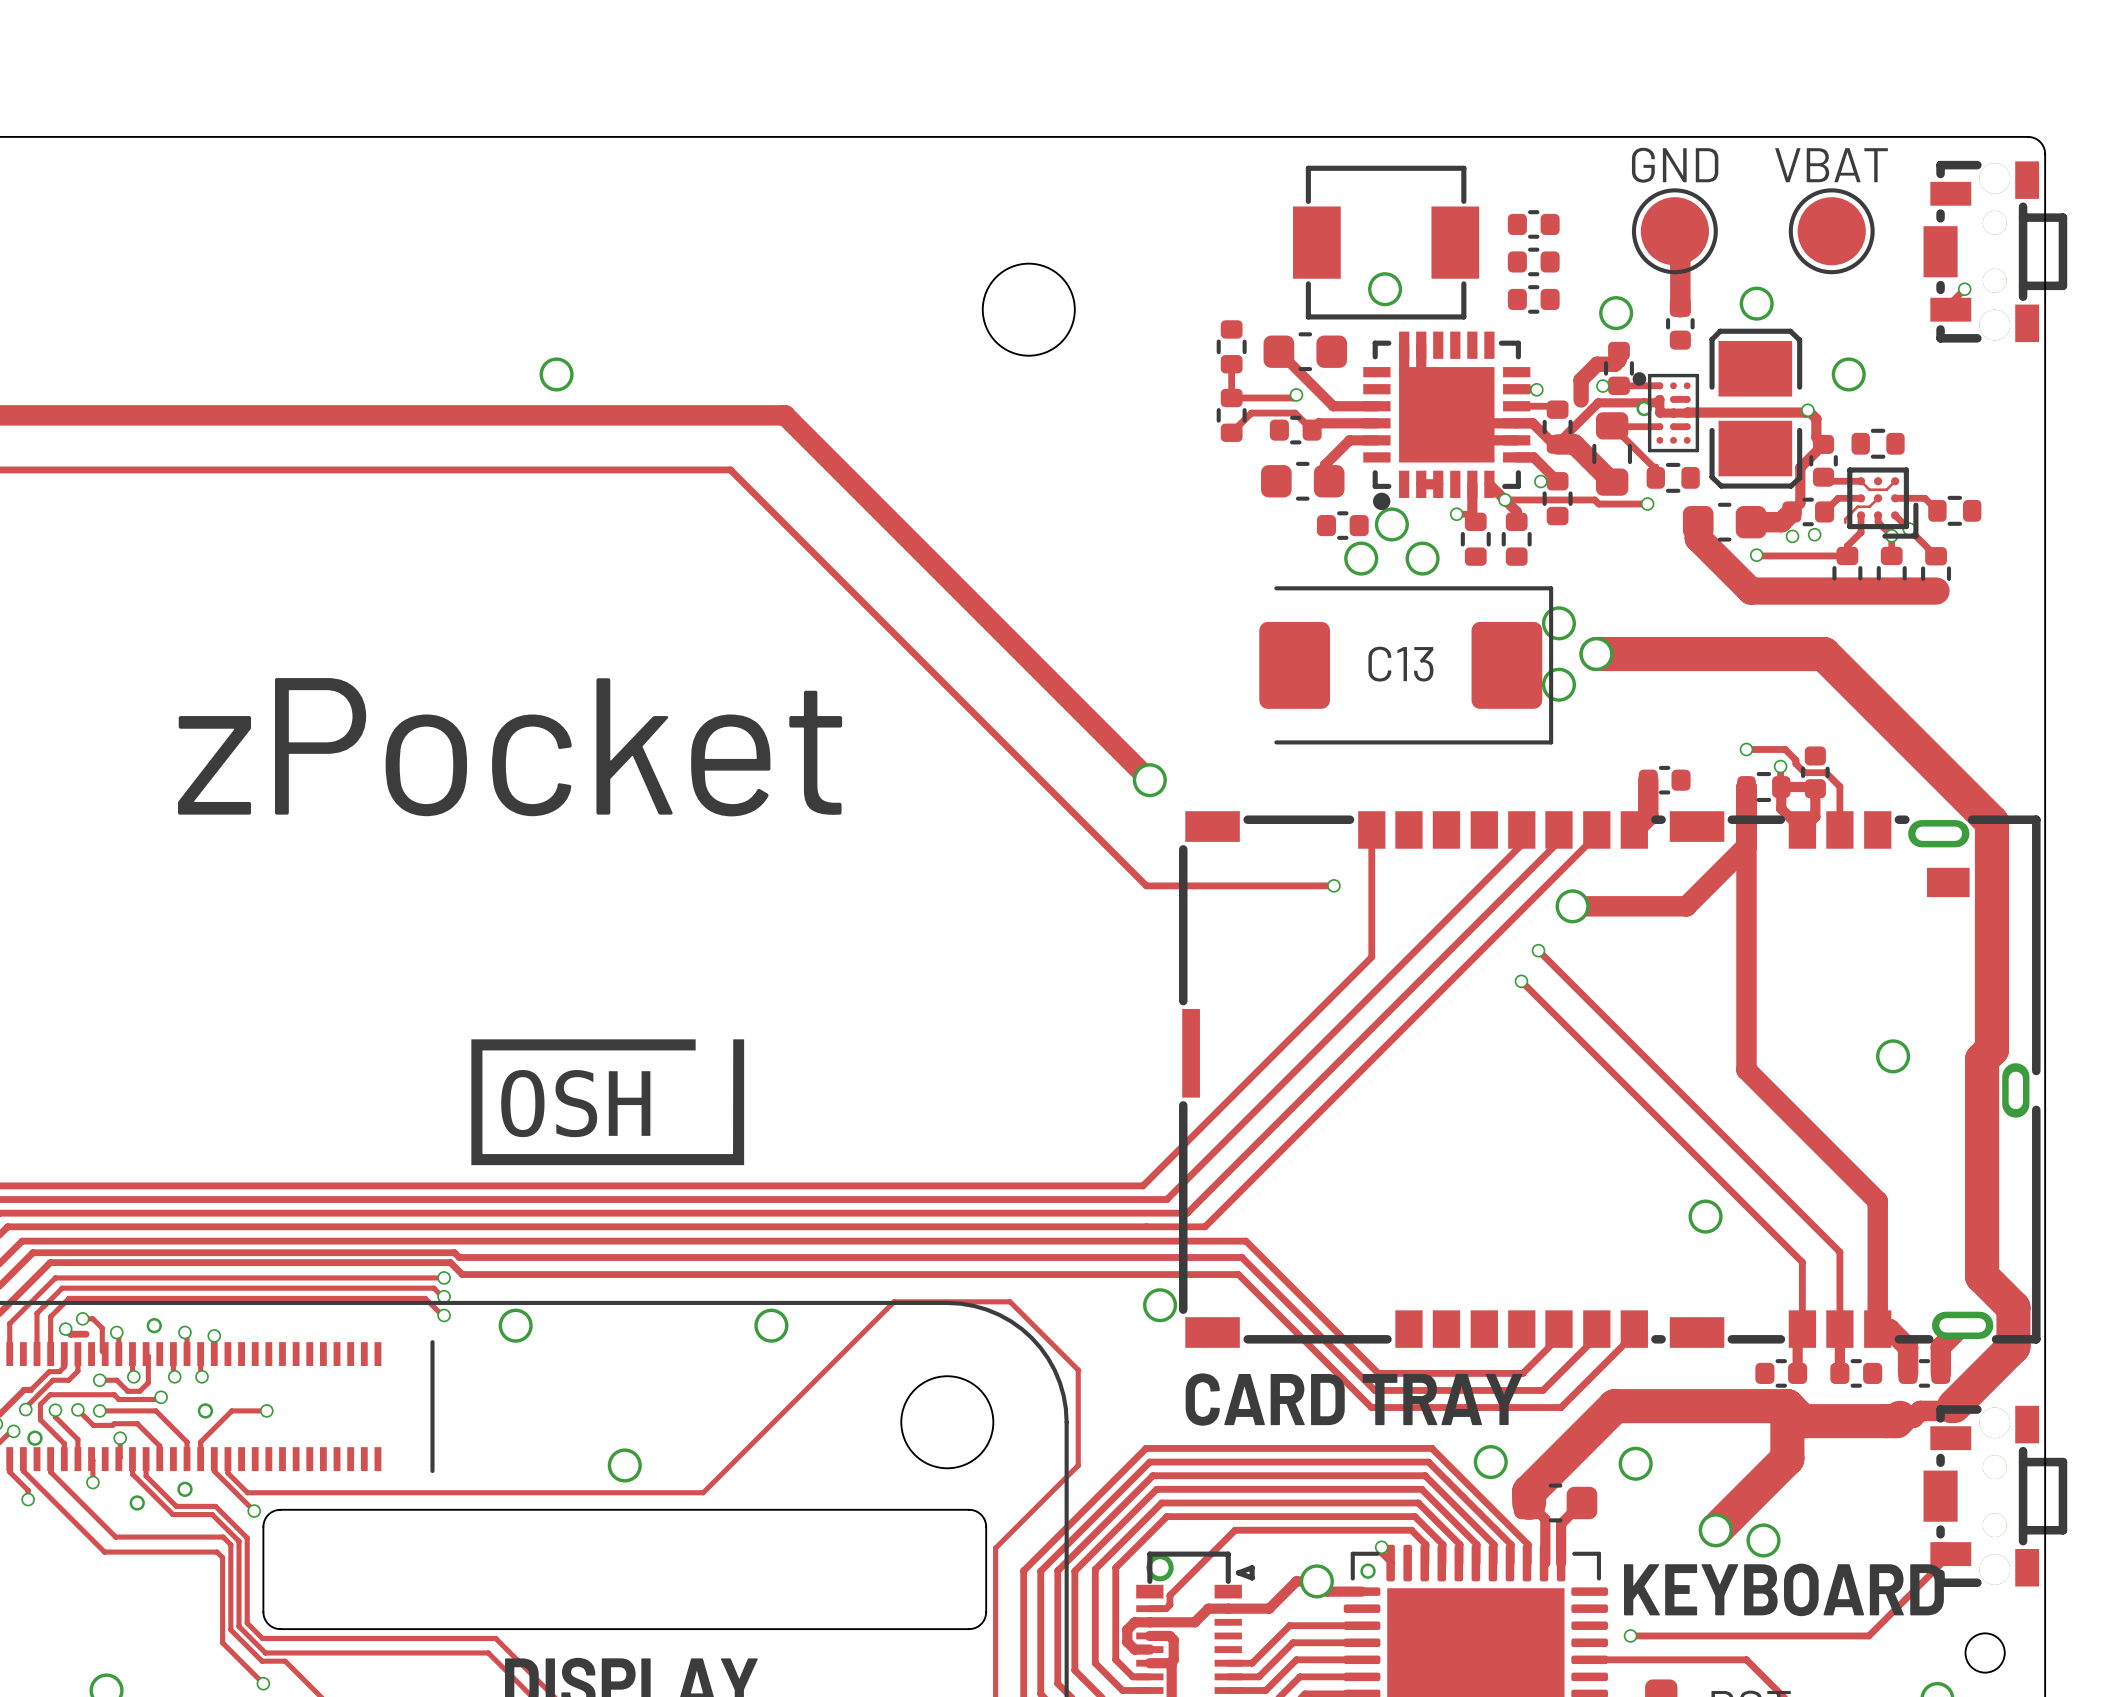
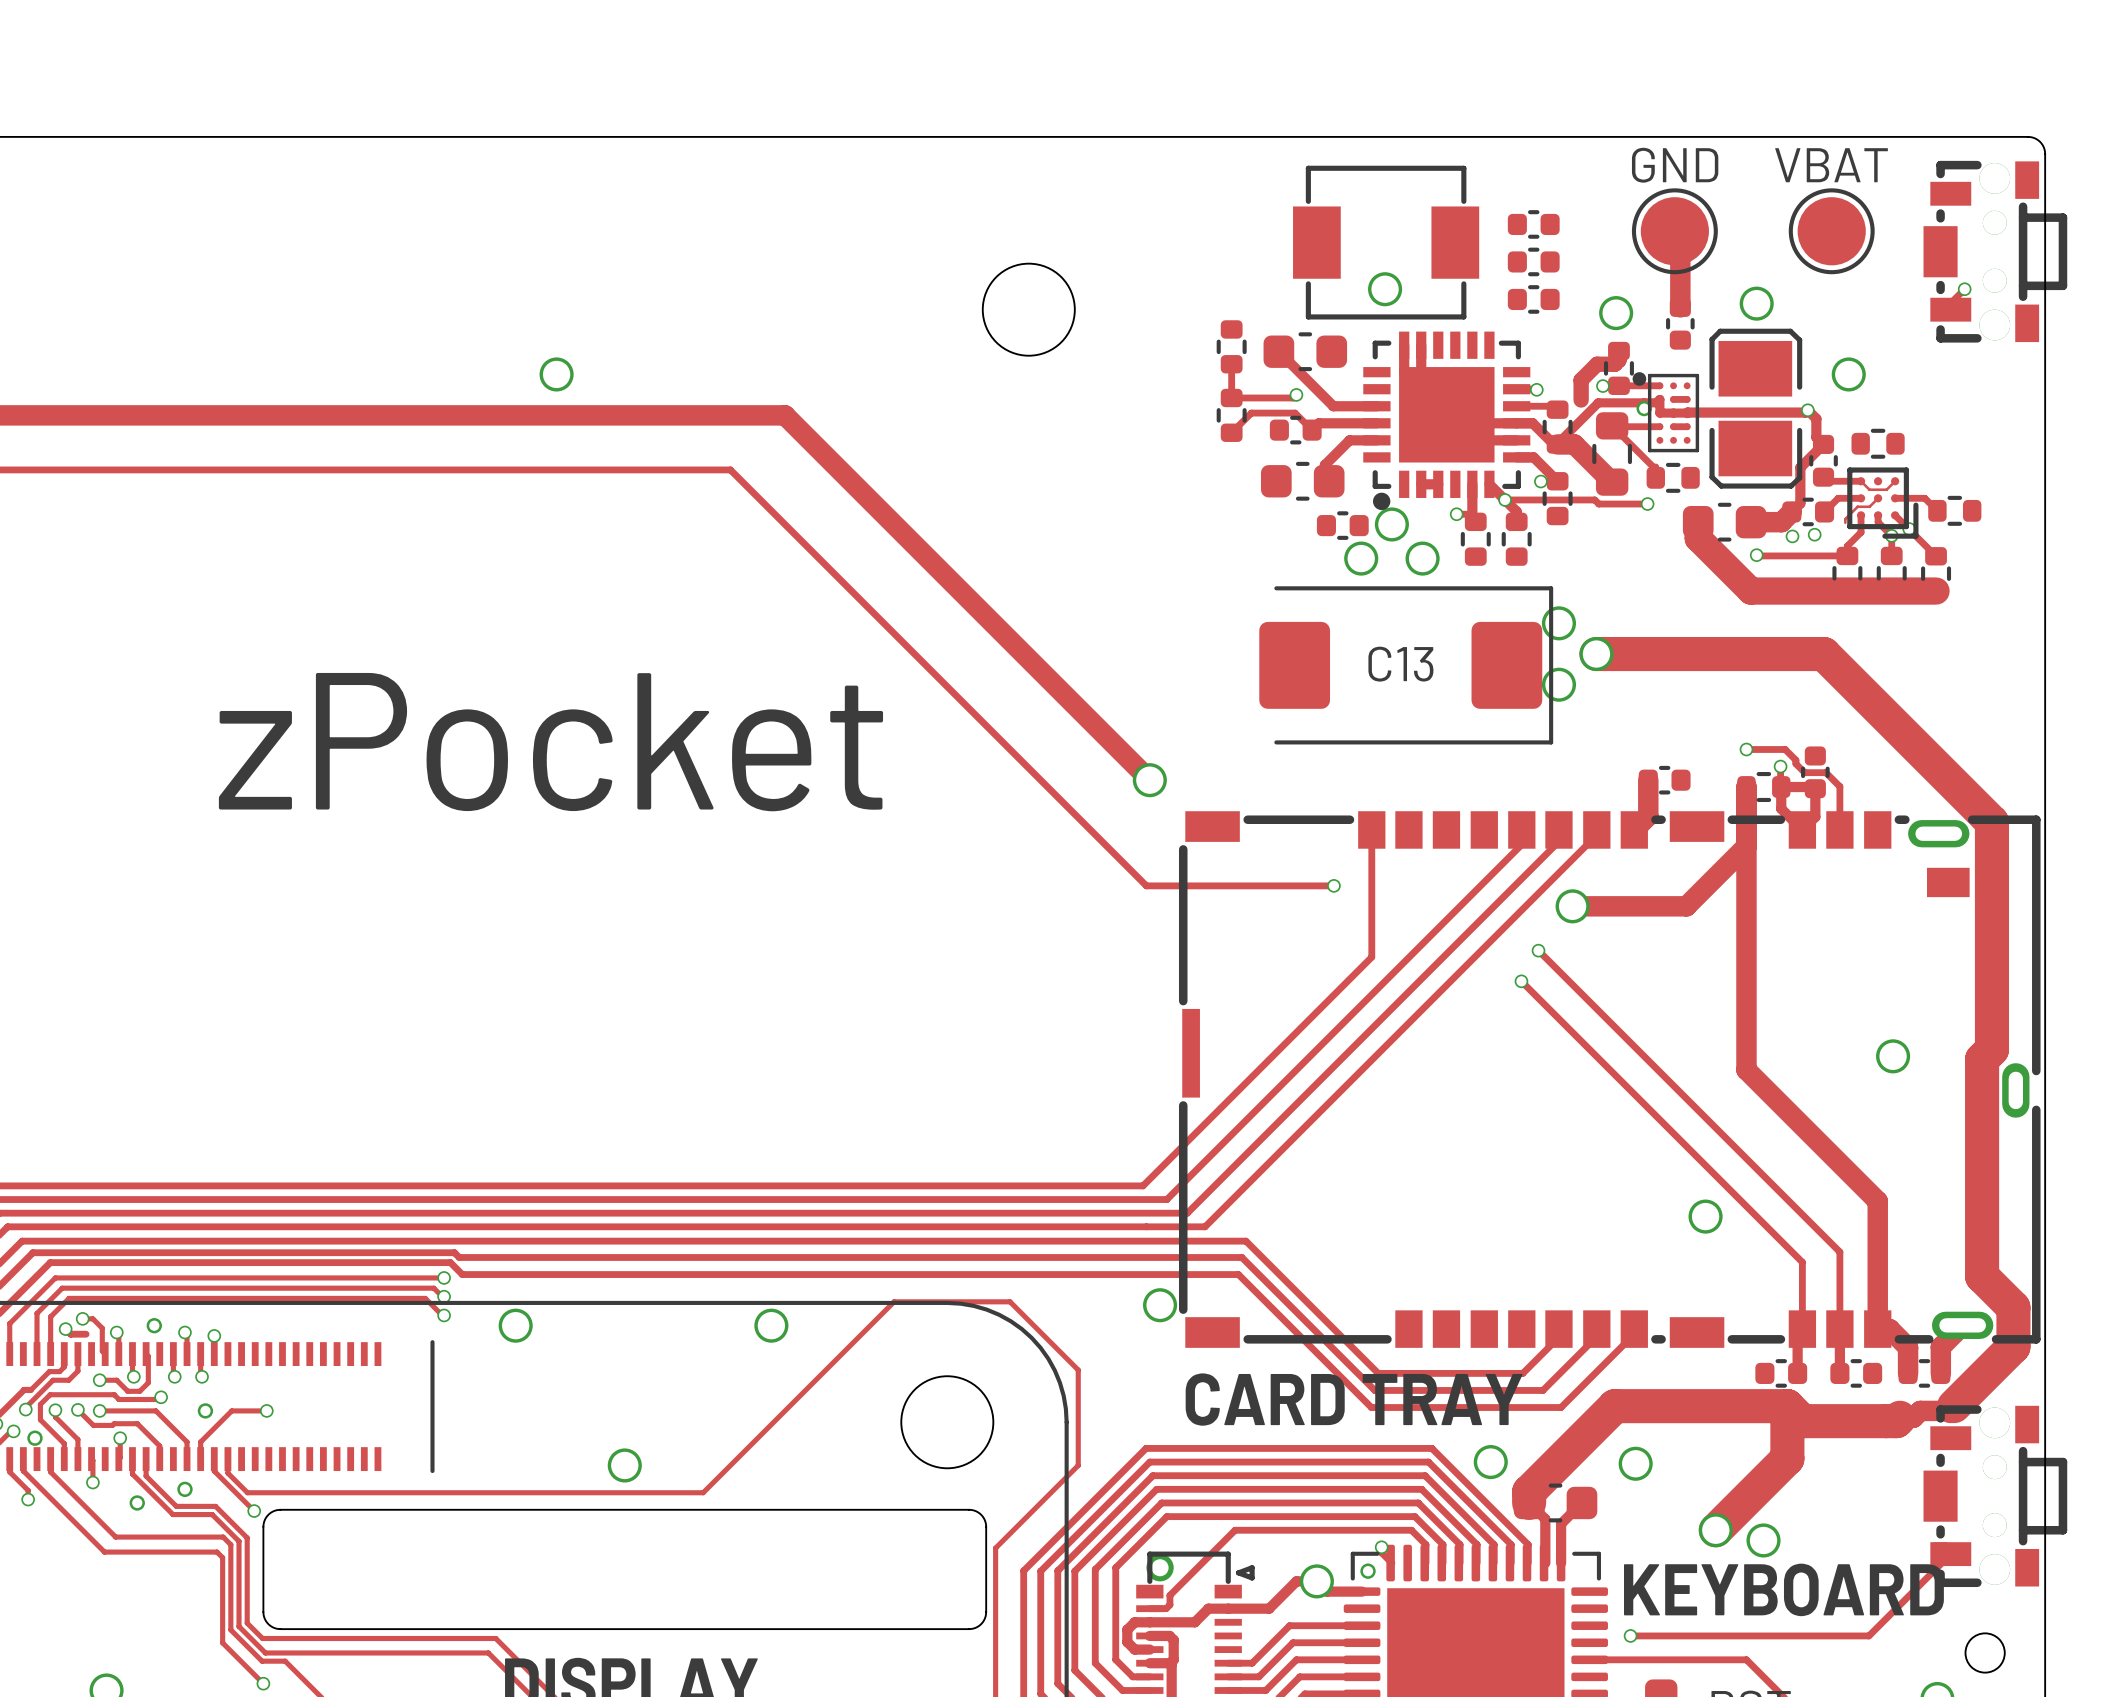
text position: zPocket (510, 747) -> zPocket (550, 742)
drawing: [471, 1039, 745, 1166] -> none

